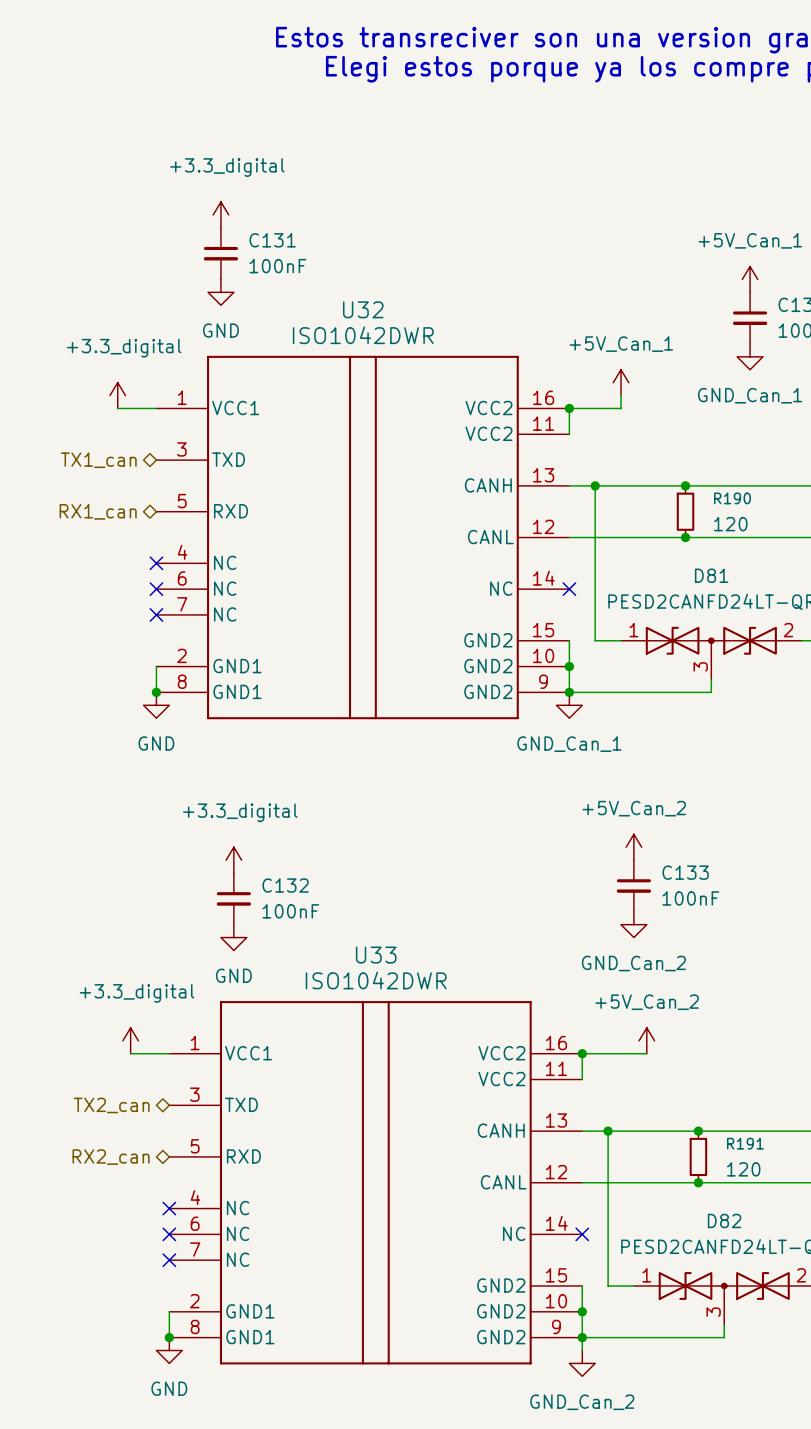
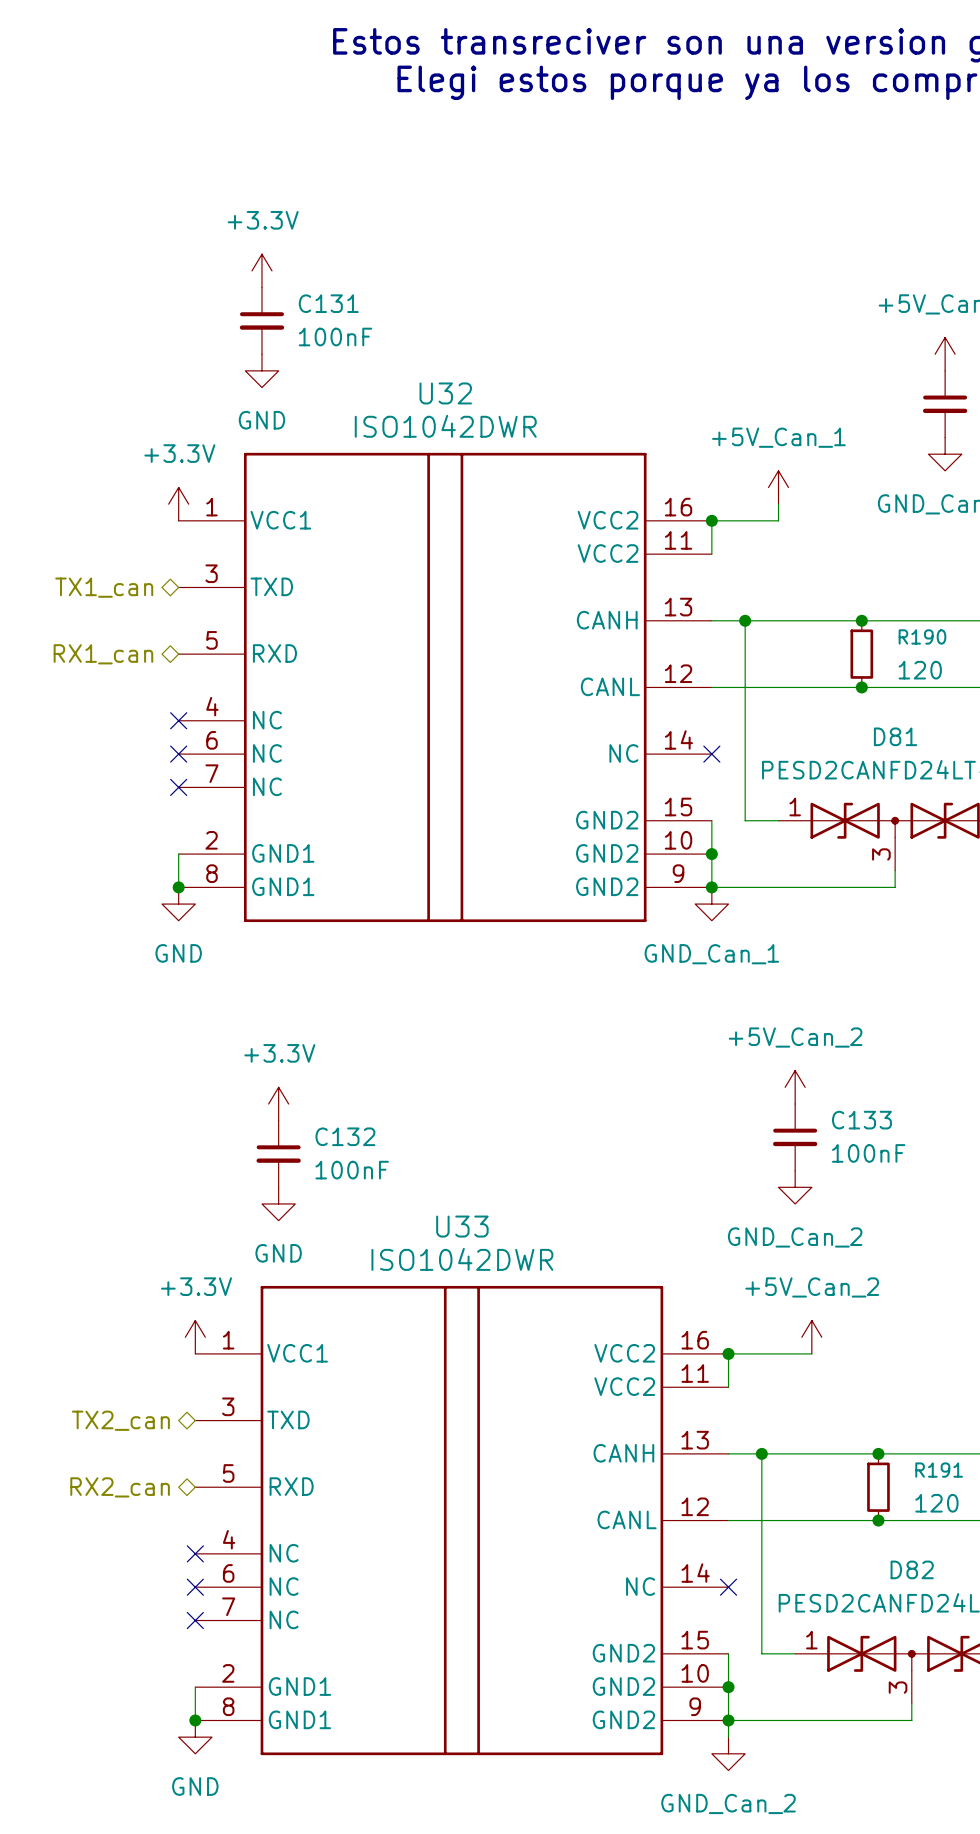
power symbol: +3.3_digital (220, 214) -> +3.3V (261, 270)
power symbol: +3.3_digital (117, 395) -> none
power symbol: none -> +3.3V (178, 504)
wire: (117, 408) (156, 408) -> none
power symbol: +3.3_digital (233, 860) -> +3.3V (278, 1104)
power symbol: +3.3_digital (130, 1040) -> none
power symbol: none -> +3.3V (195, 1337)
wire: (130, 1053) (169, 1053) -> none

